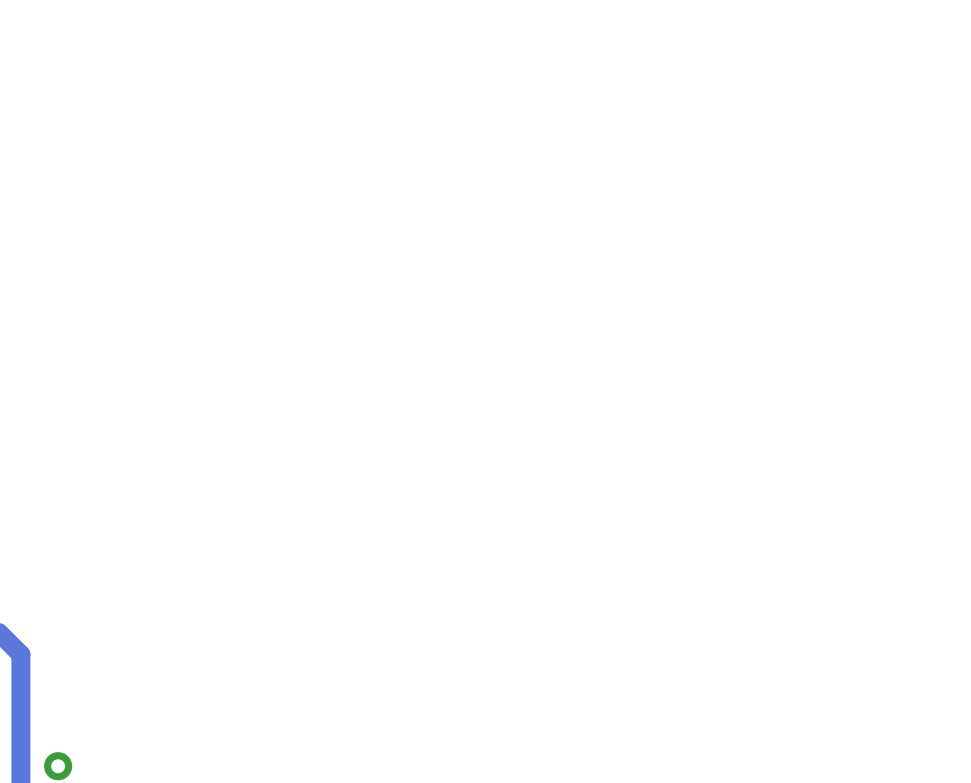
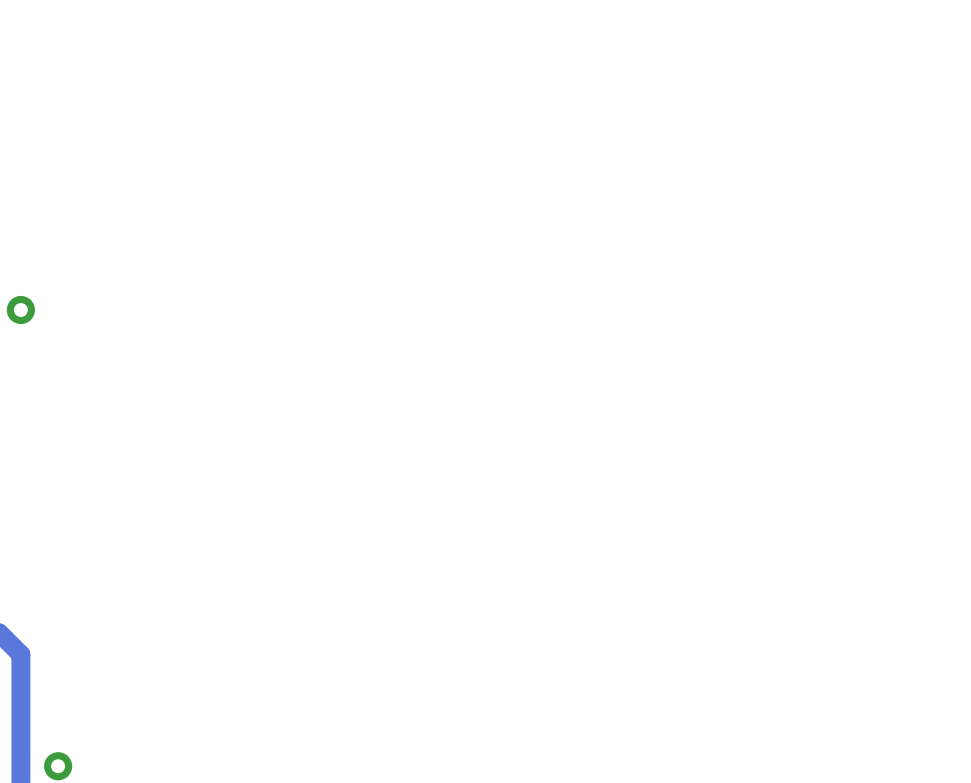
via: none -> (20, 310)

